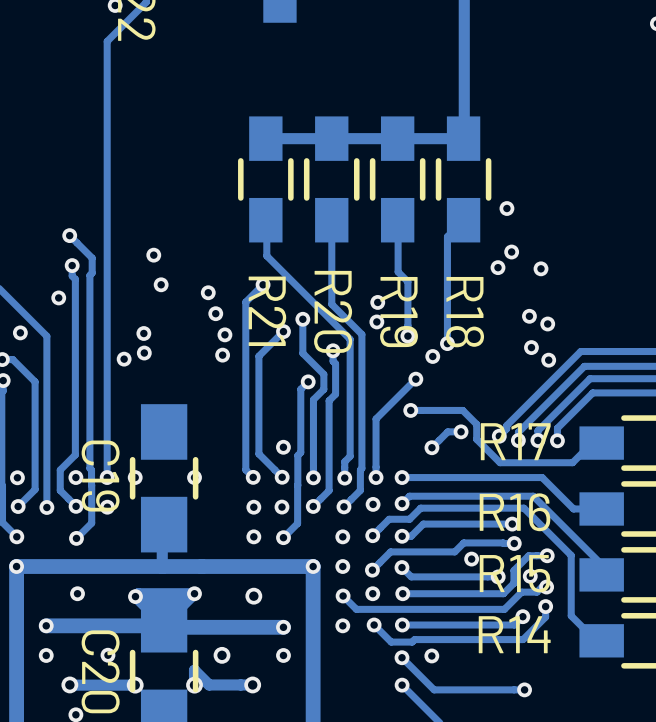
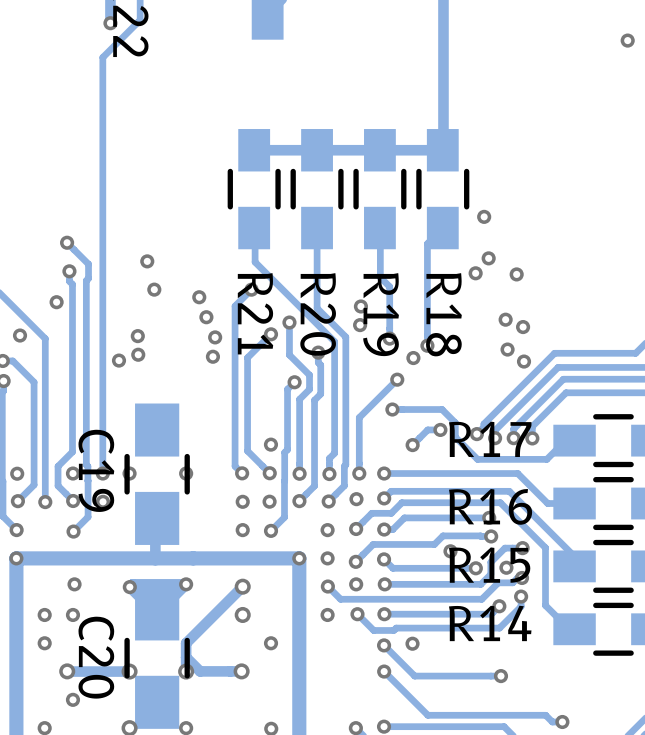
track: none -> (242, 586) (186, 643) (186, 657)
track: (46, 625) (164, 624) (166, 627) (283, 627) -> none
via: (283, 627) -> none
via position: (107, 655) -> (72, 614)
via position: (222, 655) -> (242, 614)

